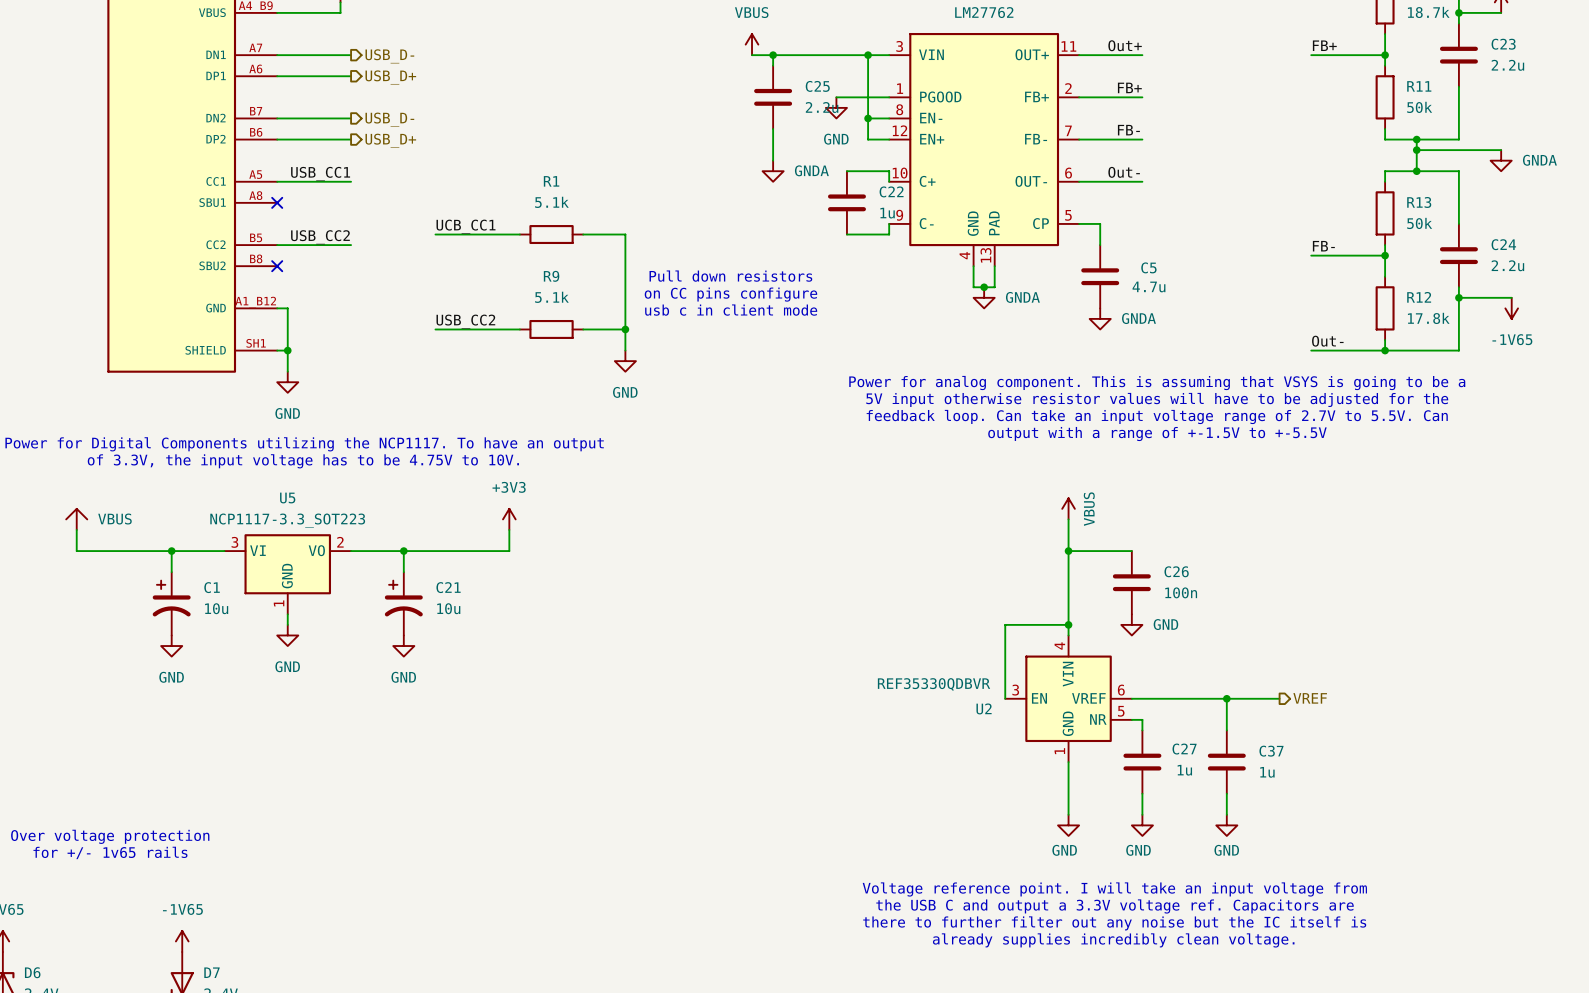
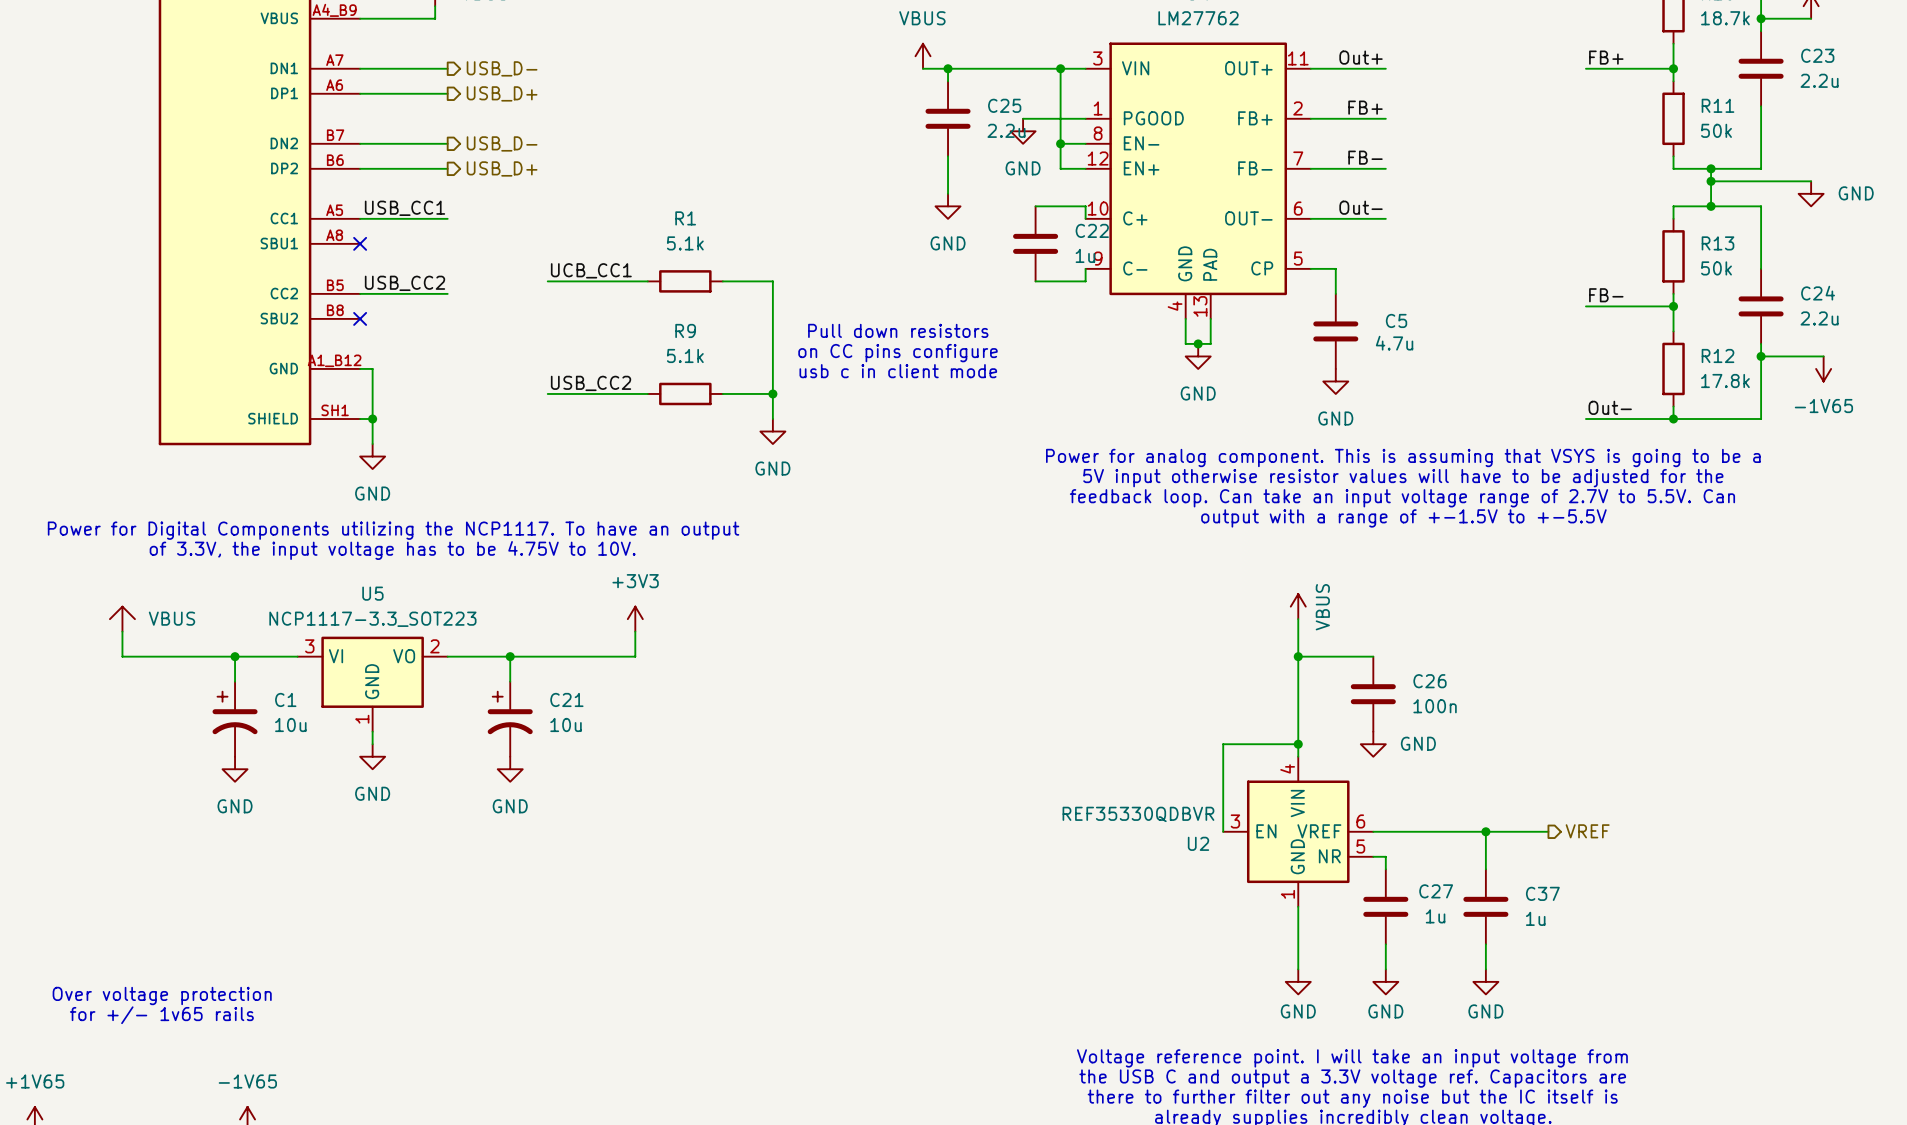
power symbol: GNDA (1501, 160) -> GND (1811, 193)
power symbol: GNDA (773, 171) -> GND (948, 206)
power symbol: GNDA (984, 297) -> GND (1198, 356)
power symbol: GNDA (1100, 318) -> GND (1335, 381)

